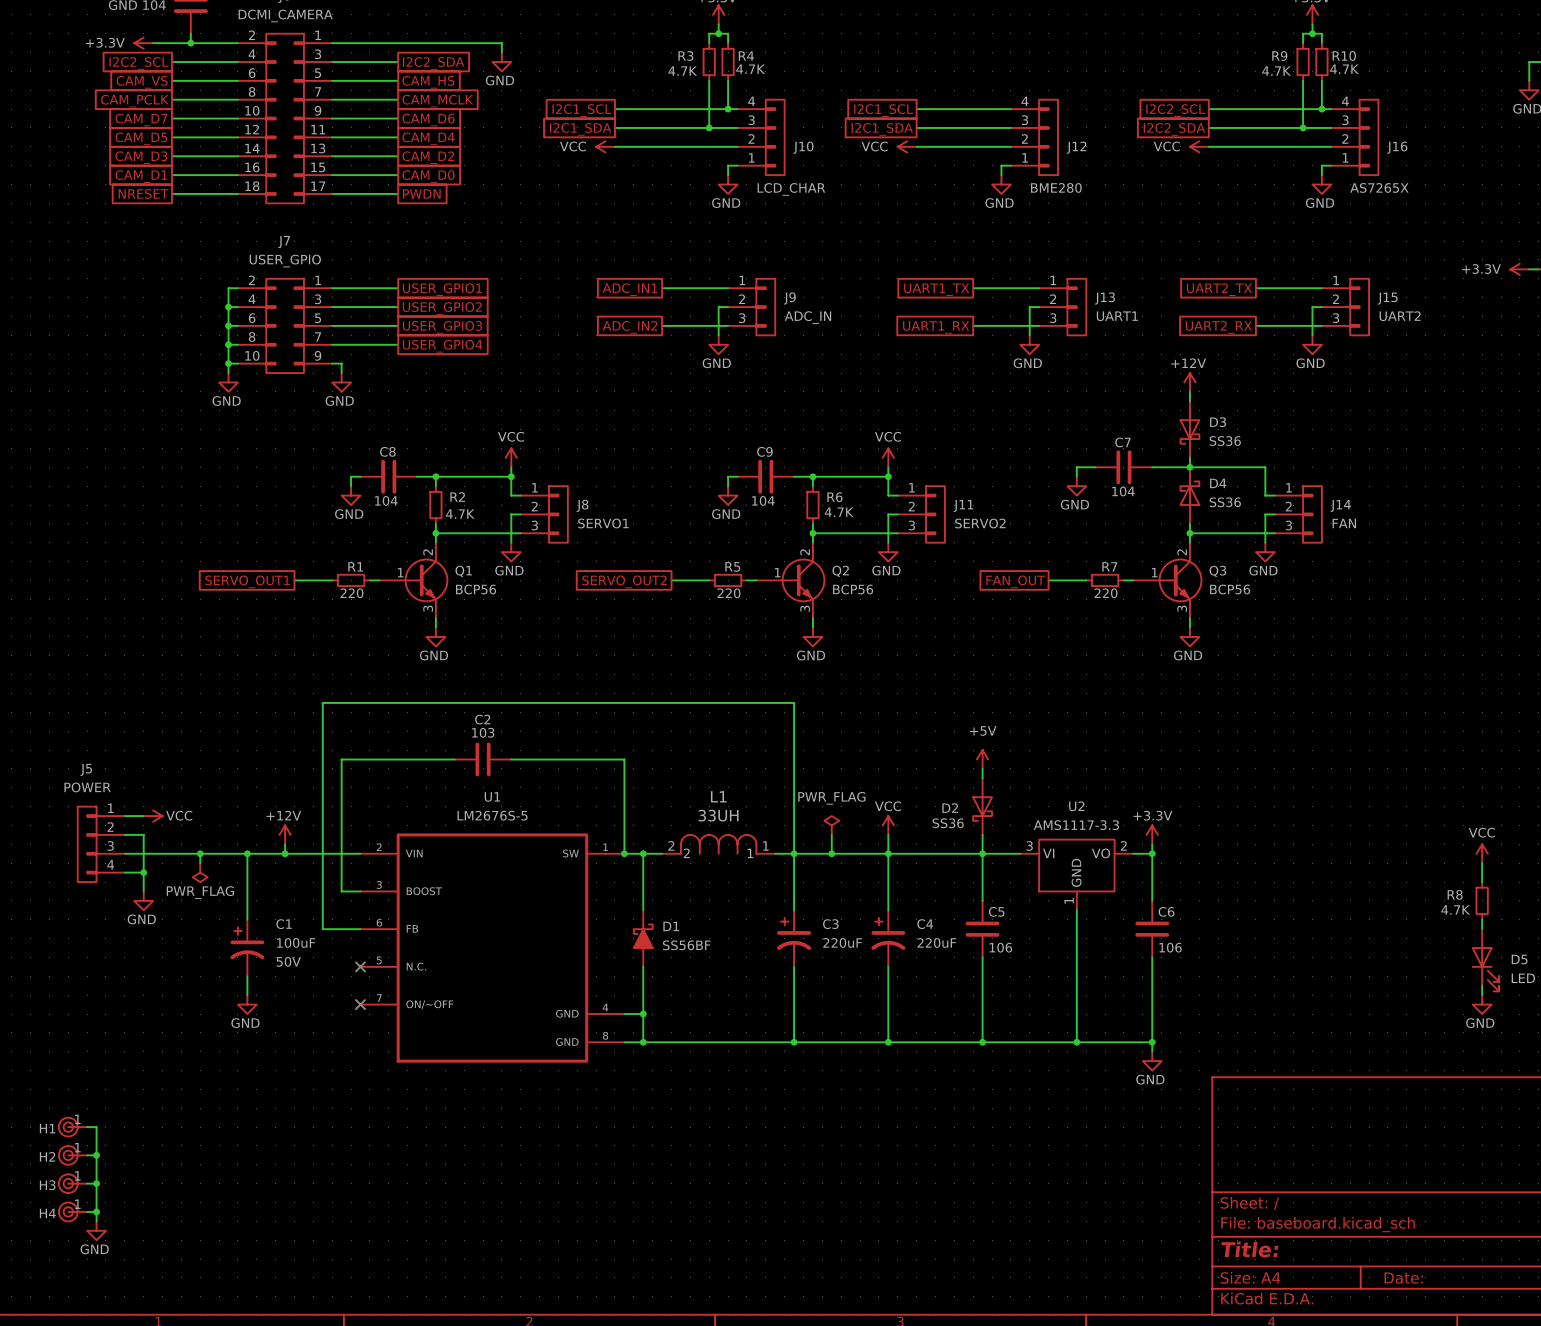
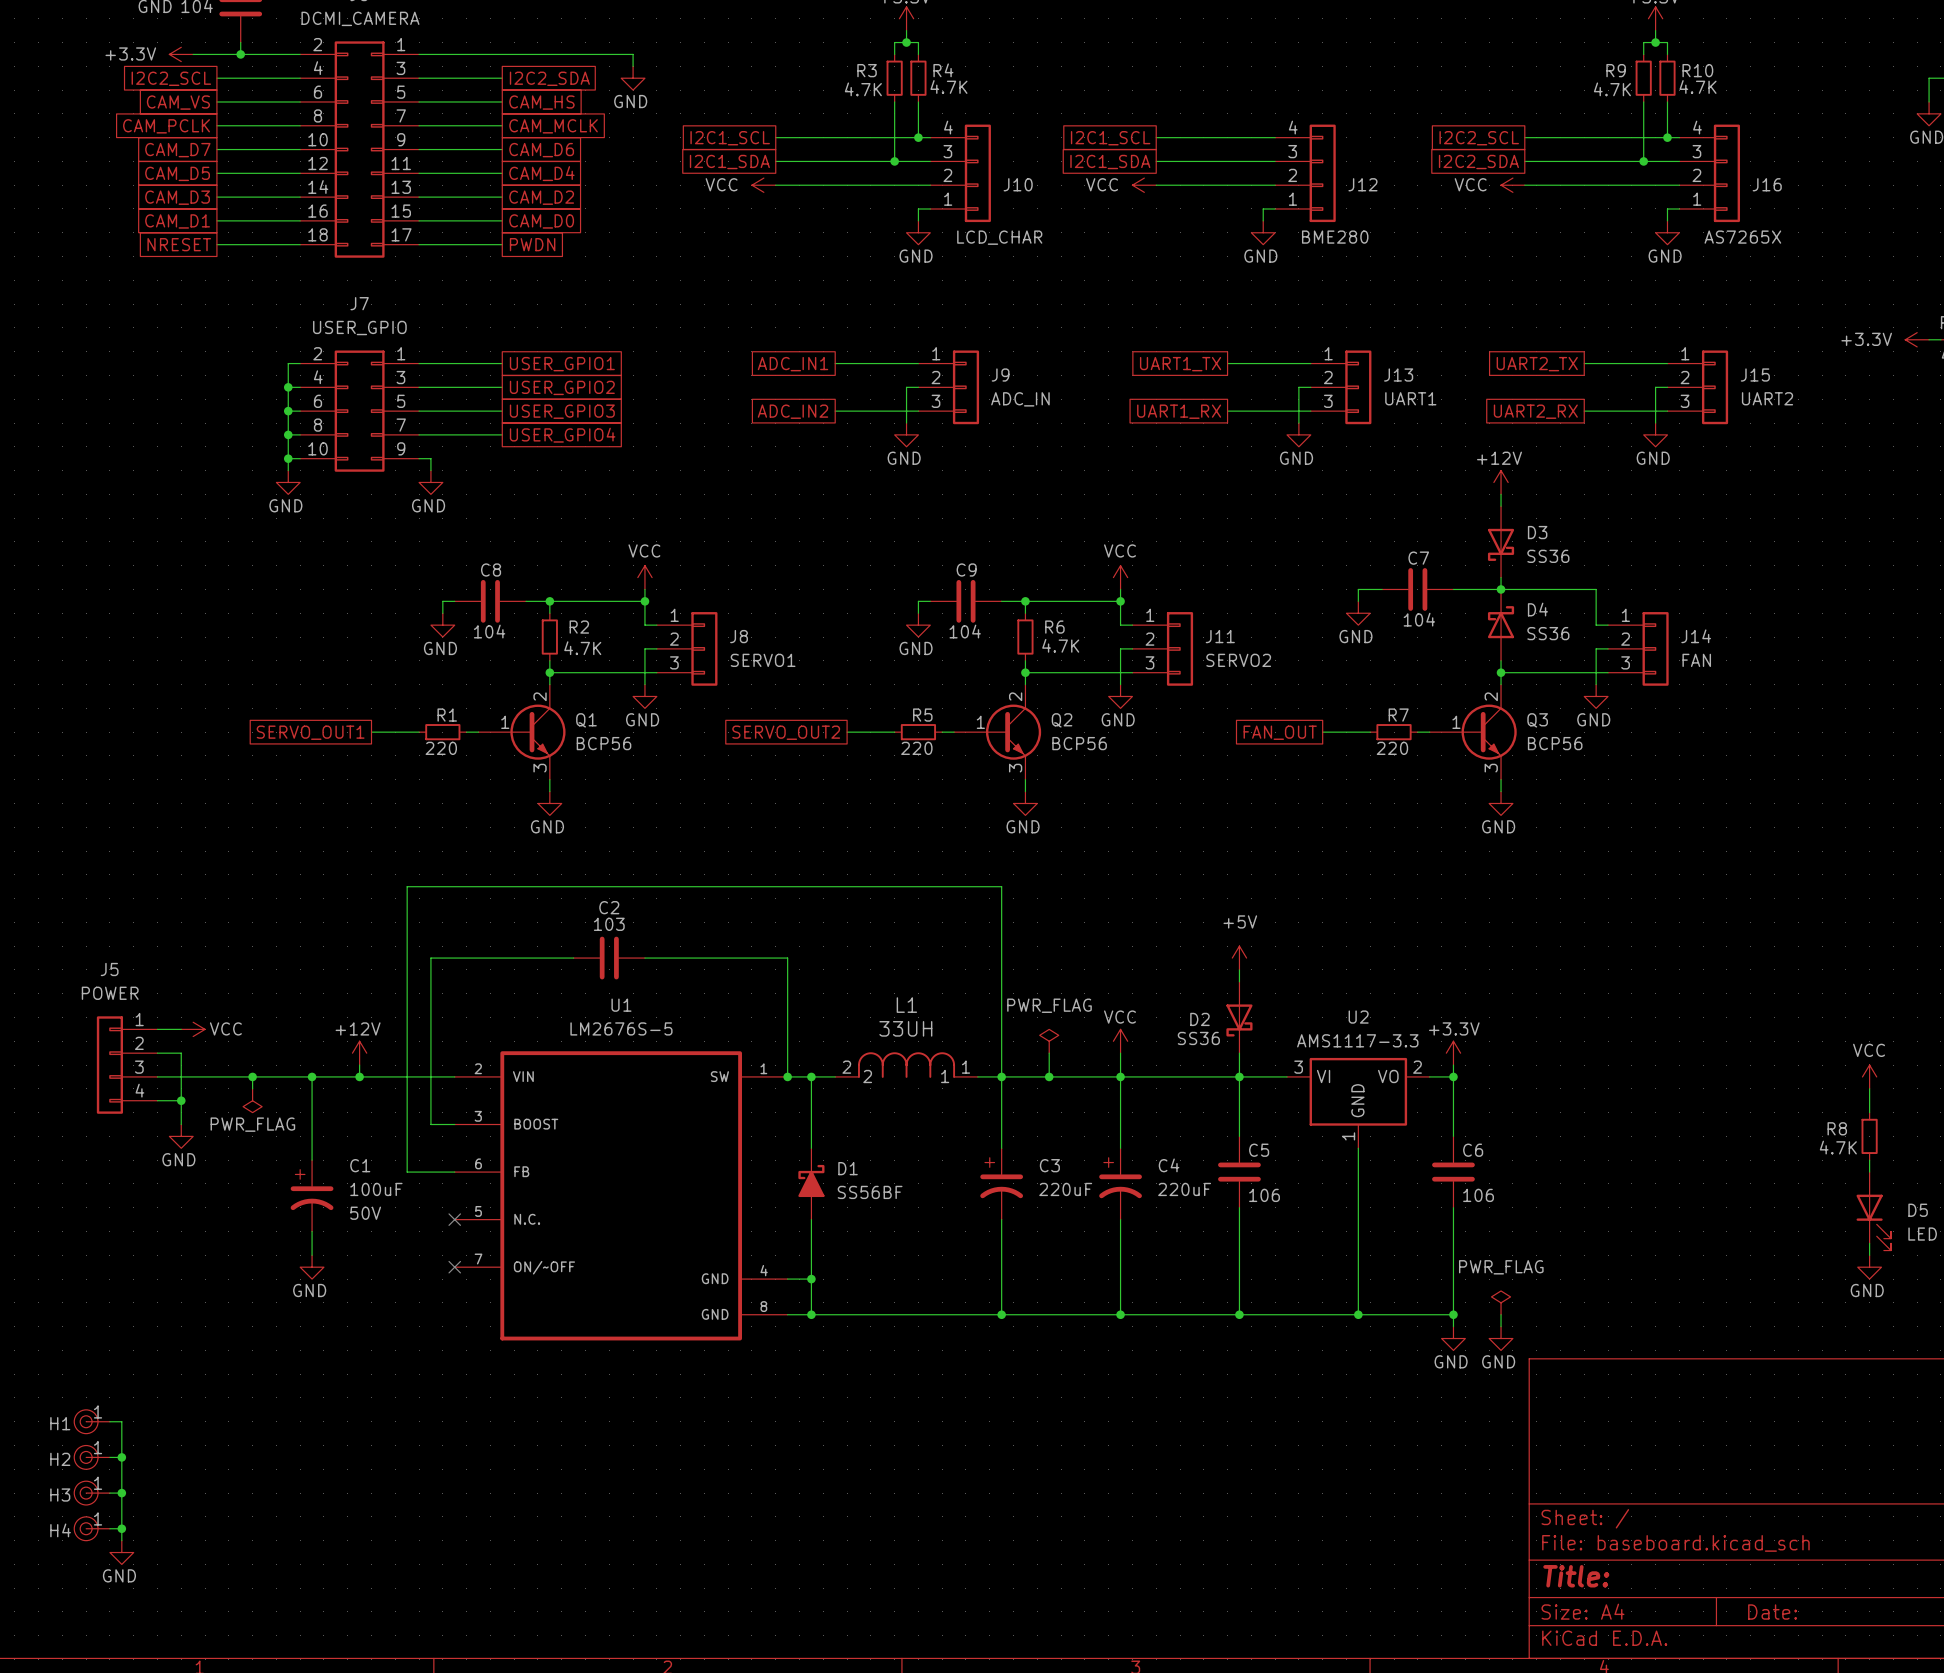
power symbol: none -> PWR_FLAG (1501, 1302)
wire: none -> (1501, 1314) (1501, 1326)
power symbol: none -> GND (1501, 1338)

